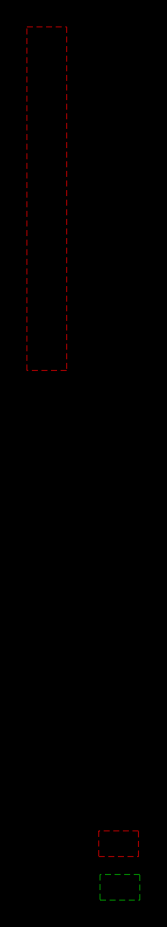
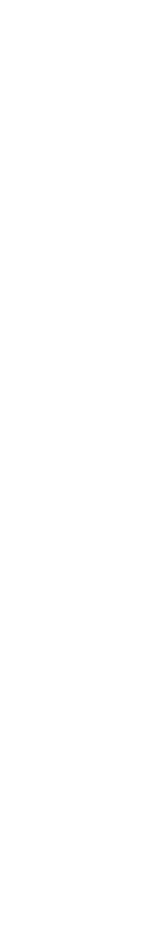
top zone outline: (26, 26) (66, 26) (66, 370) (26, 370) (26, 26) -> none
top zone outline: (98, 830) (138, 830) (138, 856) (98, 856) (98, 830) -> none
bottom zone outline: (100, 874) (139, 874) (139, 900) (100, 900) (100, 874) -> none

